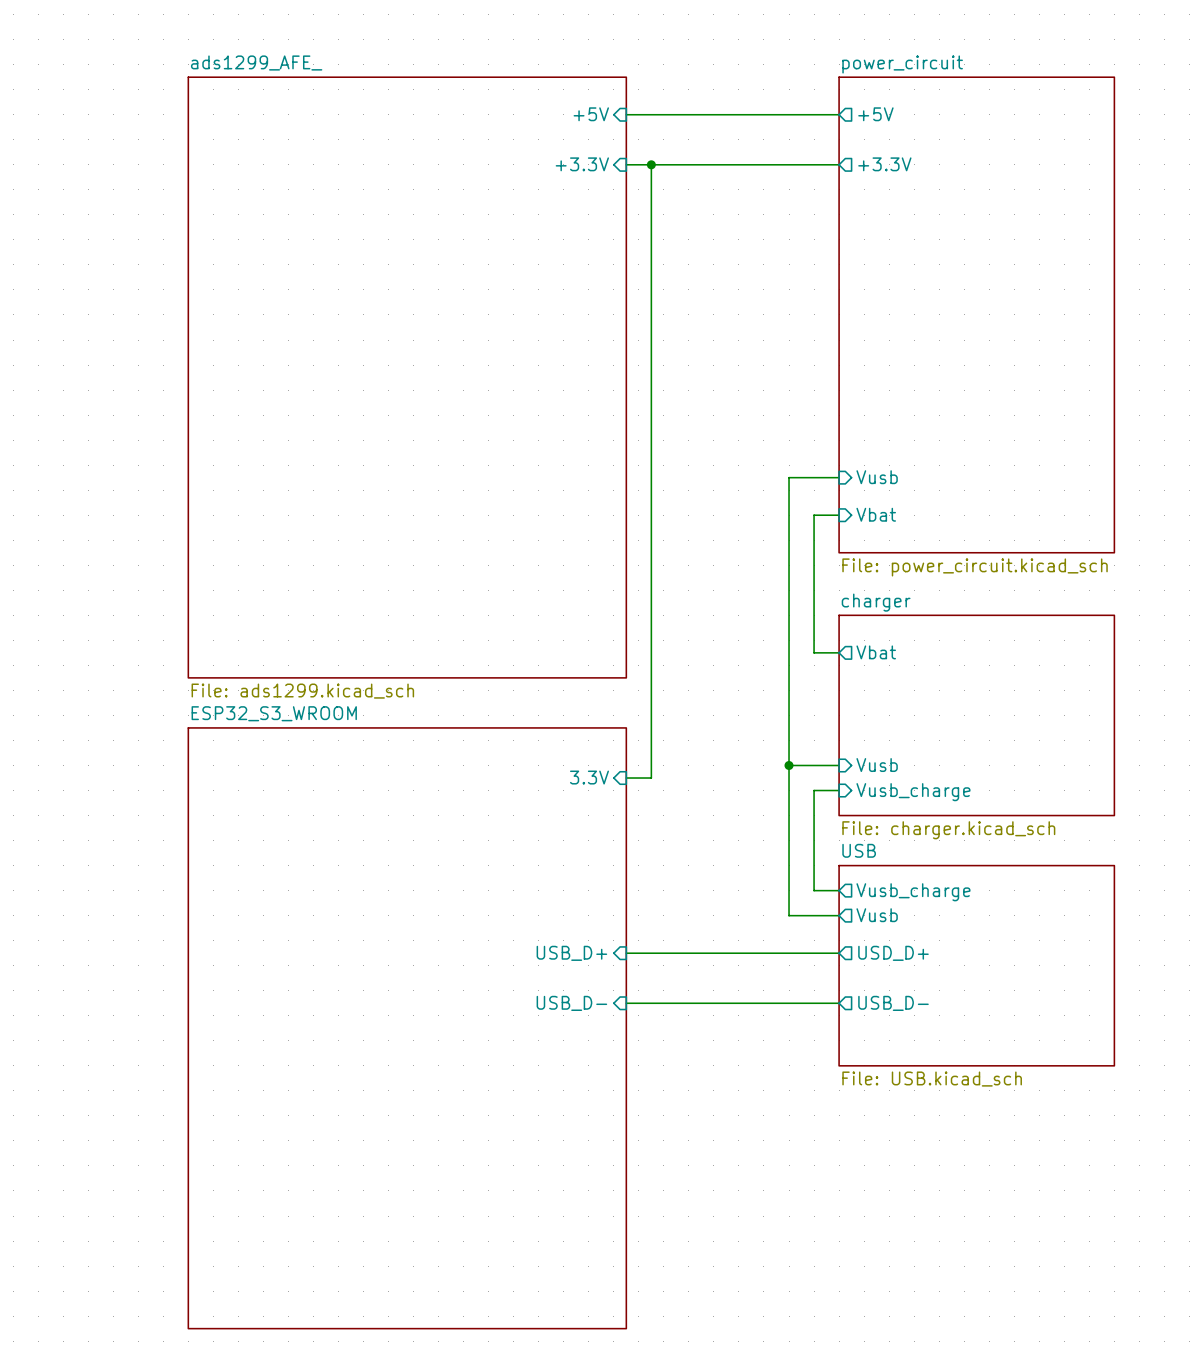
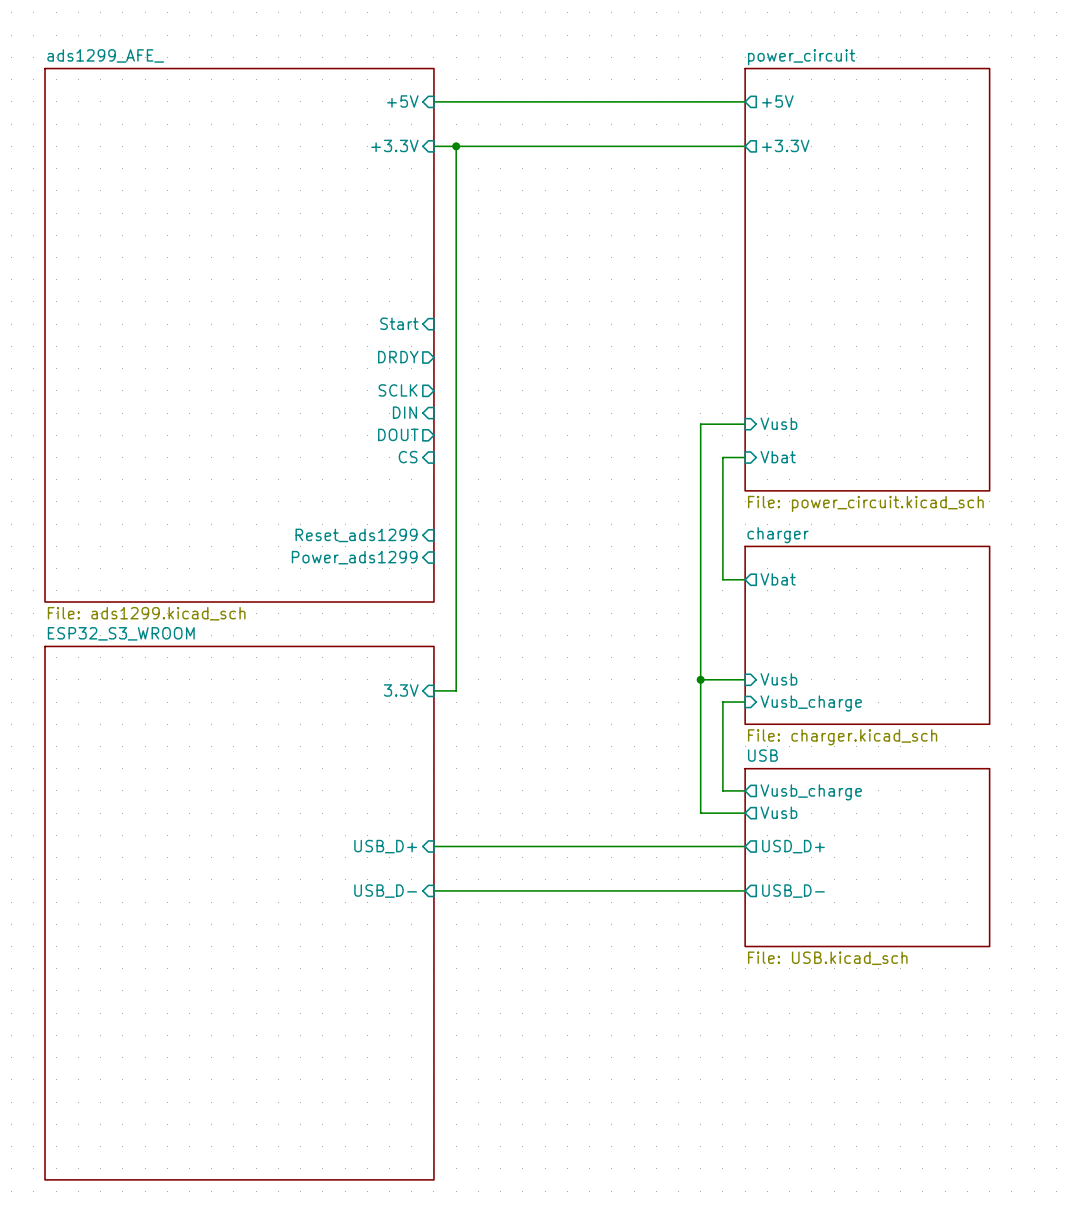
wire: none -> (433, 101) (556, 101)
sheet pin position: +5V (591, 114) -> +5V (402, 101)
wire: none -> (433, 146) (556, 146)
junction: none -> (456, 146)
sheet pin position: +3.3V (582, 164) -> +3.3V (394, 145)
wire: (651, 164) (651, 778) (626, 778) -> (456, 146) (456, 690) (433, 690)
junction: (651, 164) -> none
sheet pin: none -> Start (399, 323)
sheet ads1299_AFE_ position: (407, 377) -> (239, 335)
sheet pin: none -> DRDY (398, 357)
sheet pin: none -> SCLK (398, 390)
sheet pin: none -> DIN (404, 412)
sheet pin: none -> DOUT (398, 434)
sheet pin: none -> CS (408, 457)
sheet pin: none -> Reset_ads1299 (356, 535)
sheet pin: none -> Power_ads1299 (354, 557)
sheet pin position: 3.3V (589, 777) -> 3.3V (401, 690)
wire: none -> (433, 846) (556, 846)
sheet pin position: USB_D+ (571, 953) -> USB_D+ (385, 846)
wire: none -> (433, 890) (556, 890)
sheet pin position: USB_D- (571, 1003) -> USB_D- (385, 891)
sheet ESP32_S3_WROOM position: (407, 1028) -> (239, 913)

